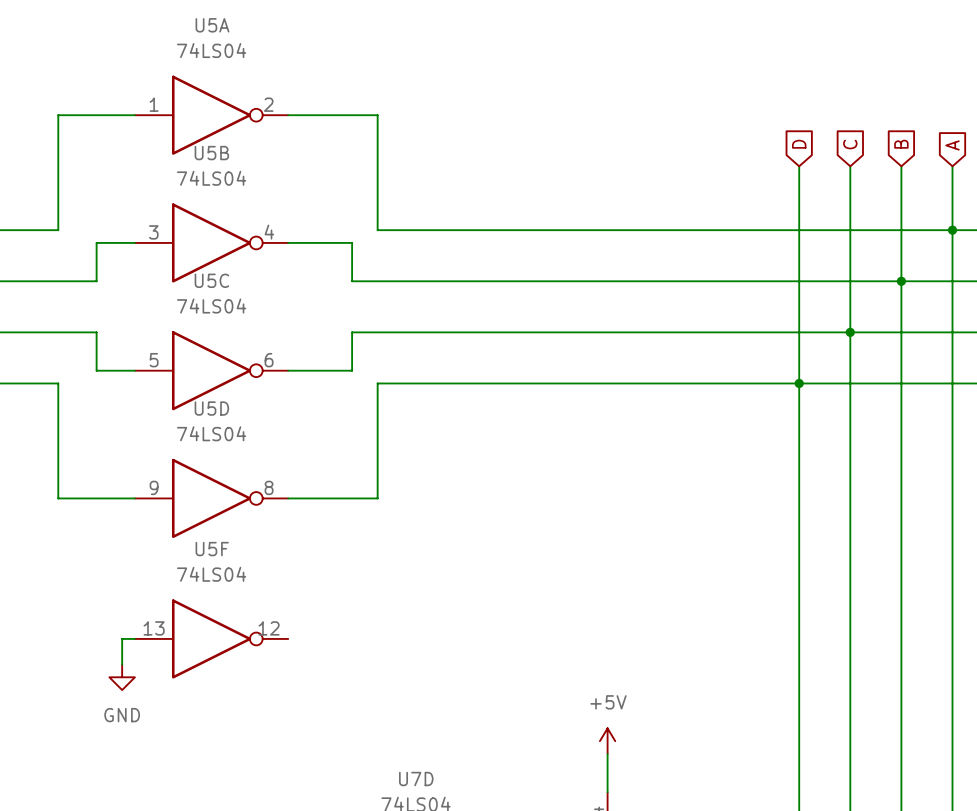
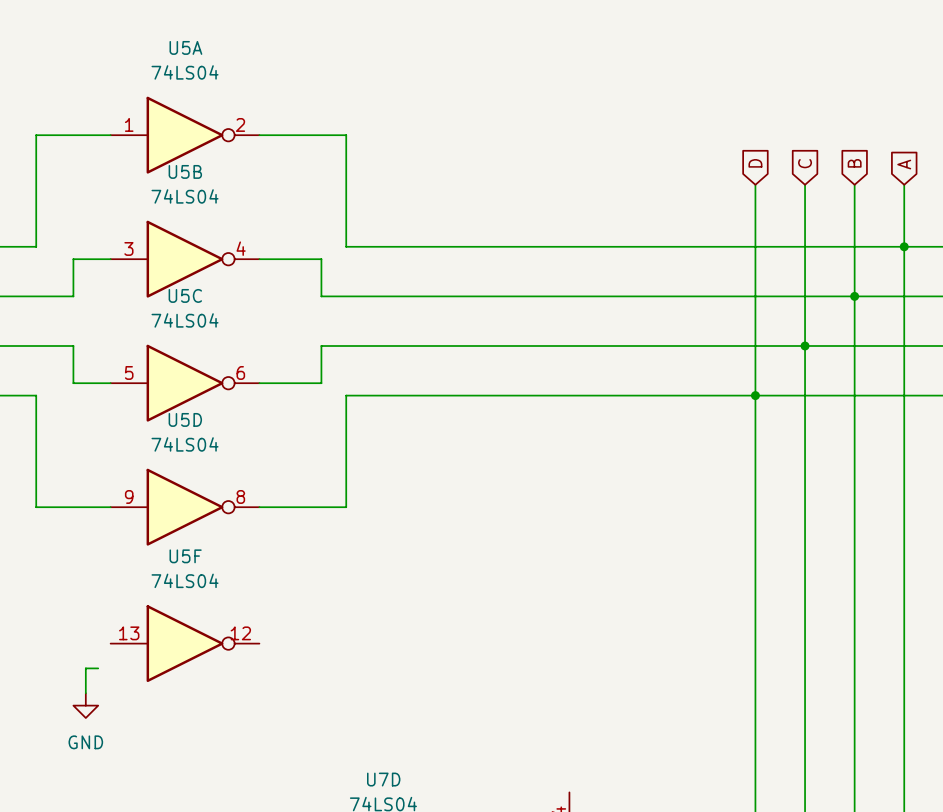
wire: (134, 638) (122, 638) (122, 664) -> (85, 693) (85, 668) (98, 668)
power symbol position: GND (122, 677) -> GND (85, 705)
power symbol: +5V (607, 741) -> none
wire: (607, 753) (607, 792) -> none

